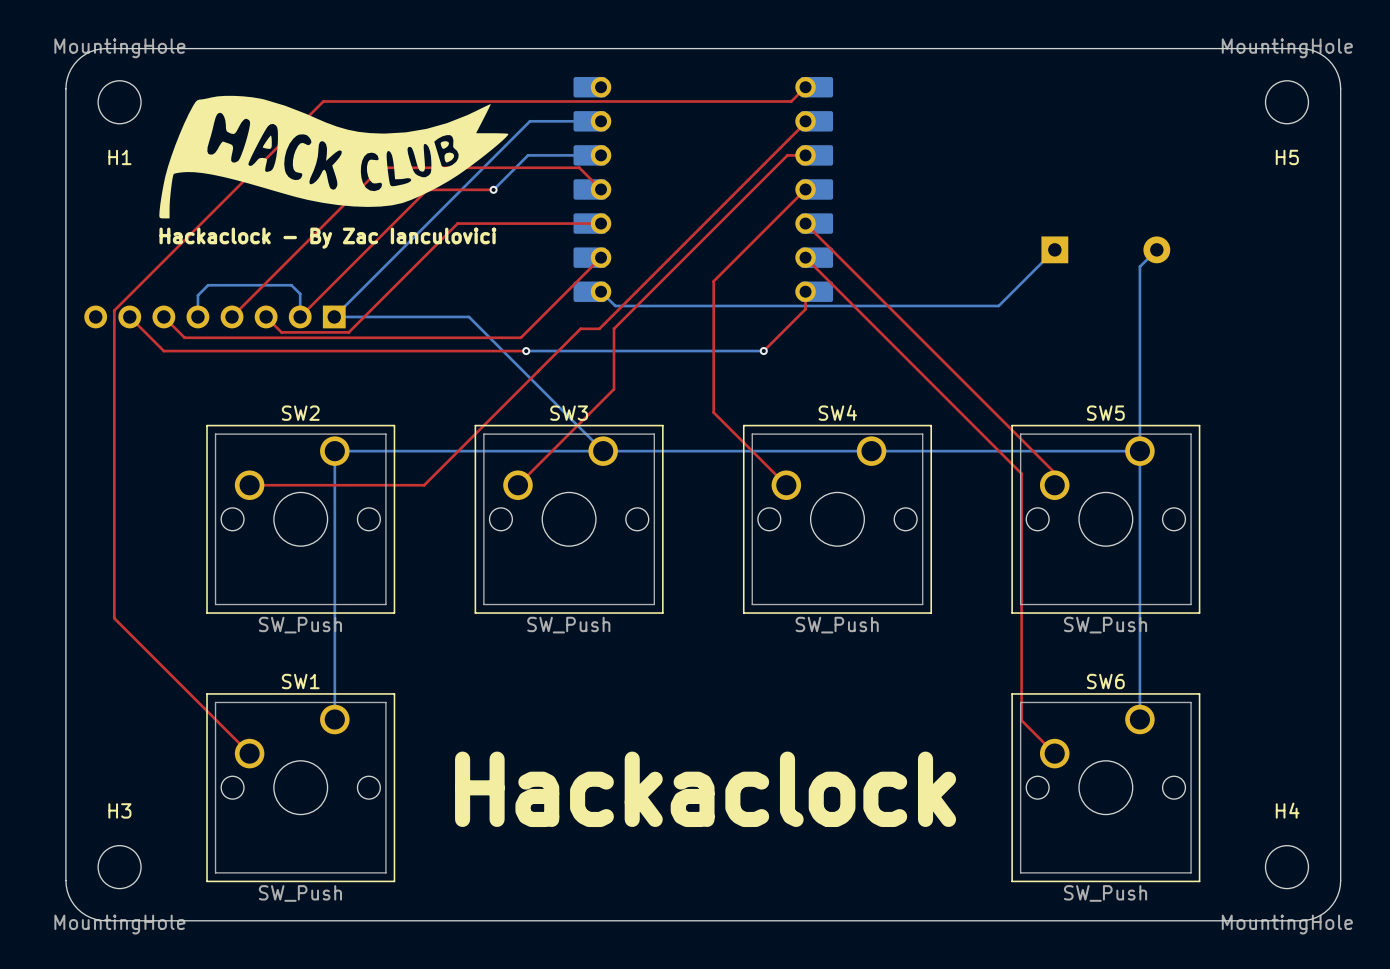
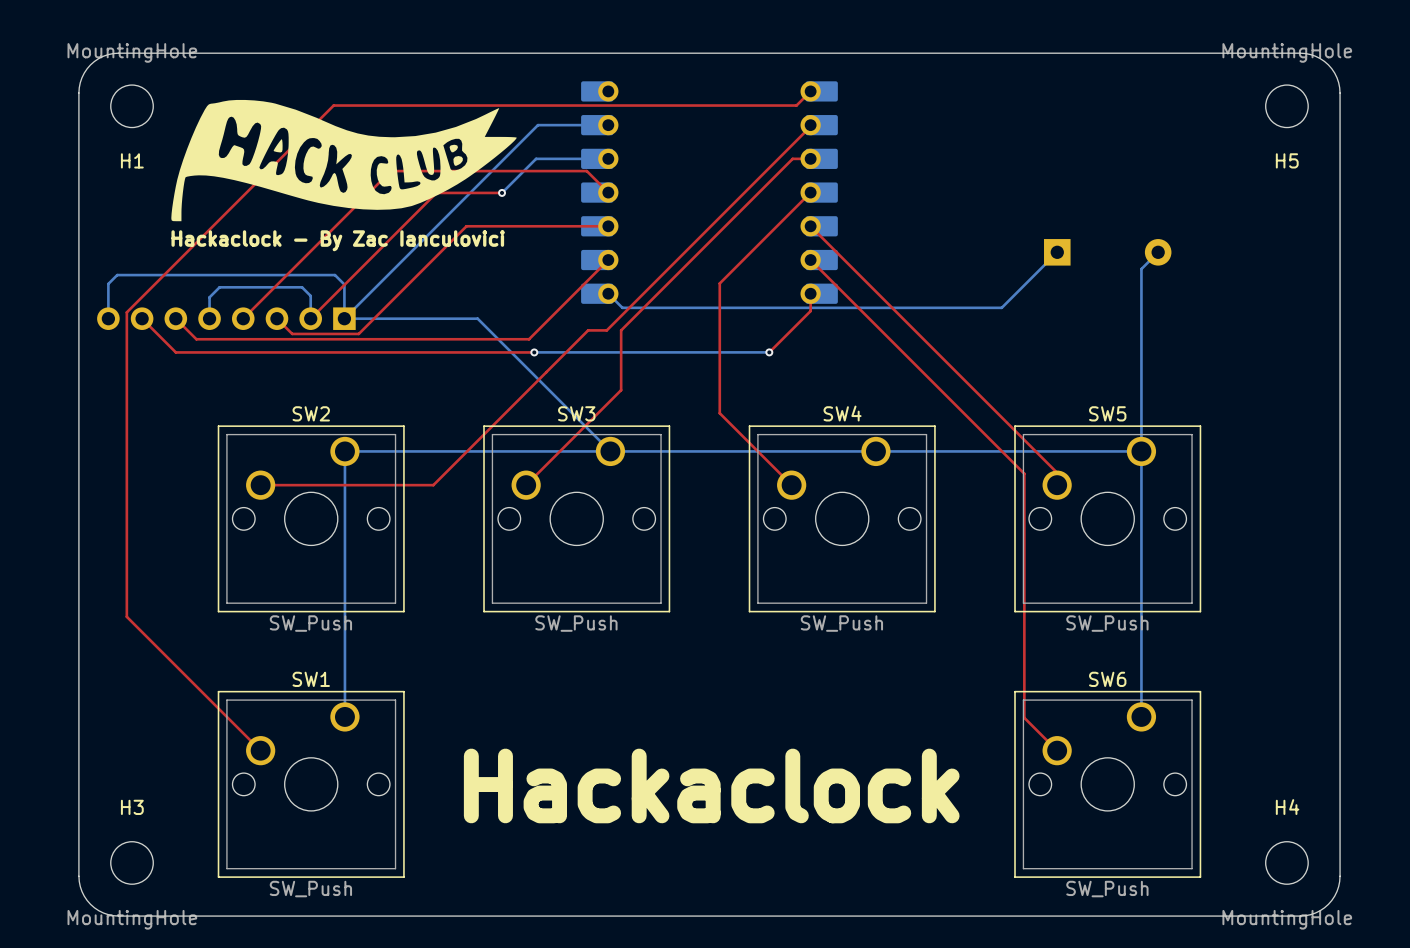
bottom track: none -> (108, 318) (108, 283) (117, 275) (334, 275) (344, 284) (344, 318)

